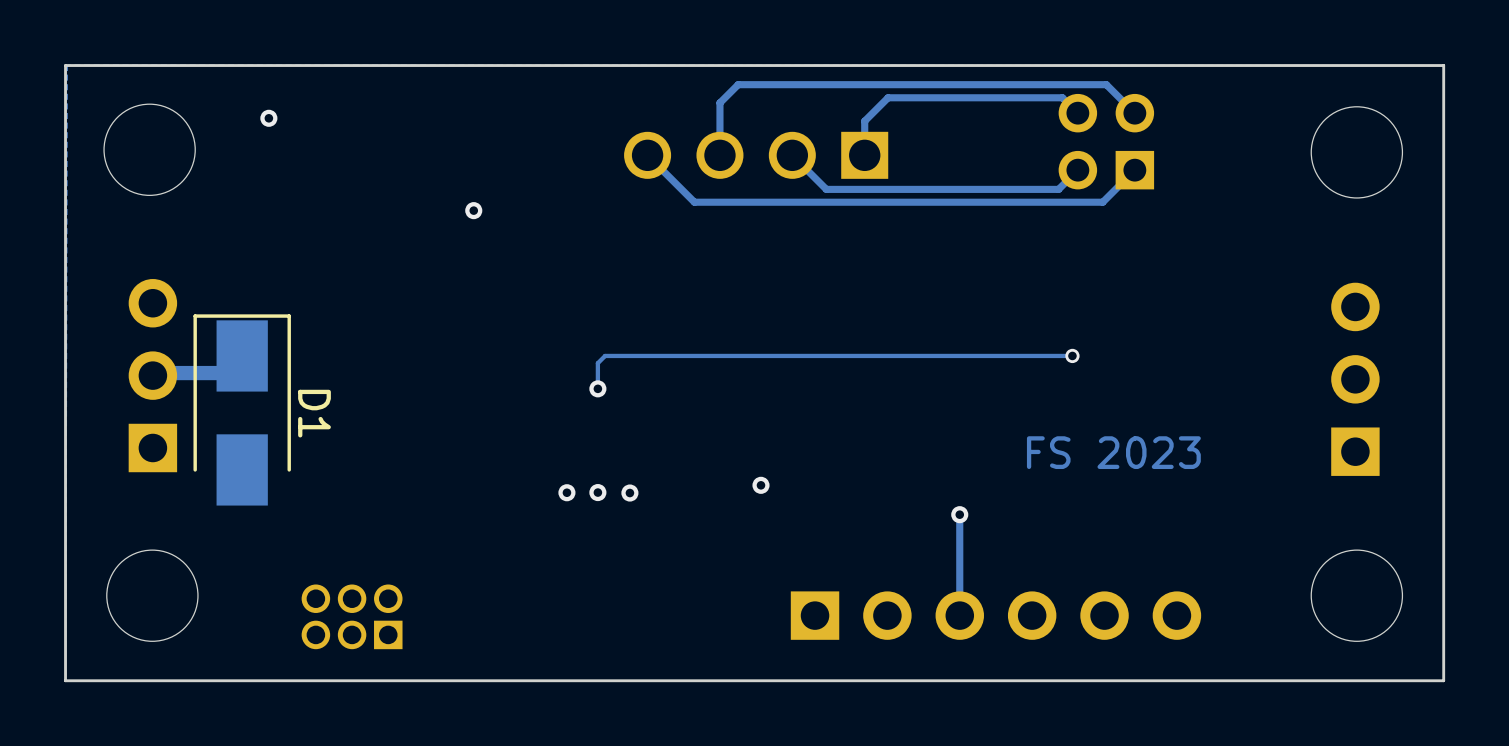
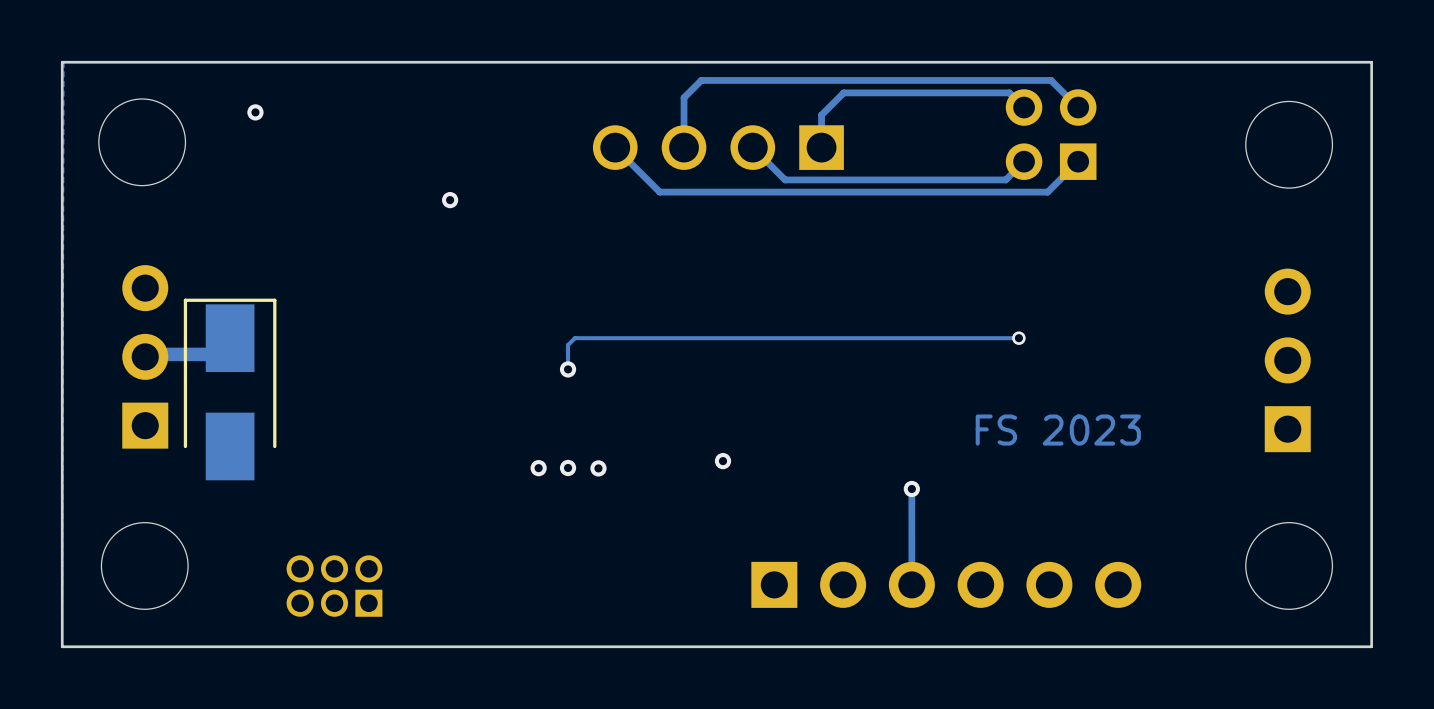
D1 name: D1 (314, 413) -> none

